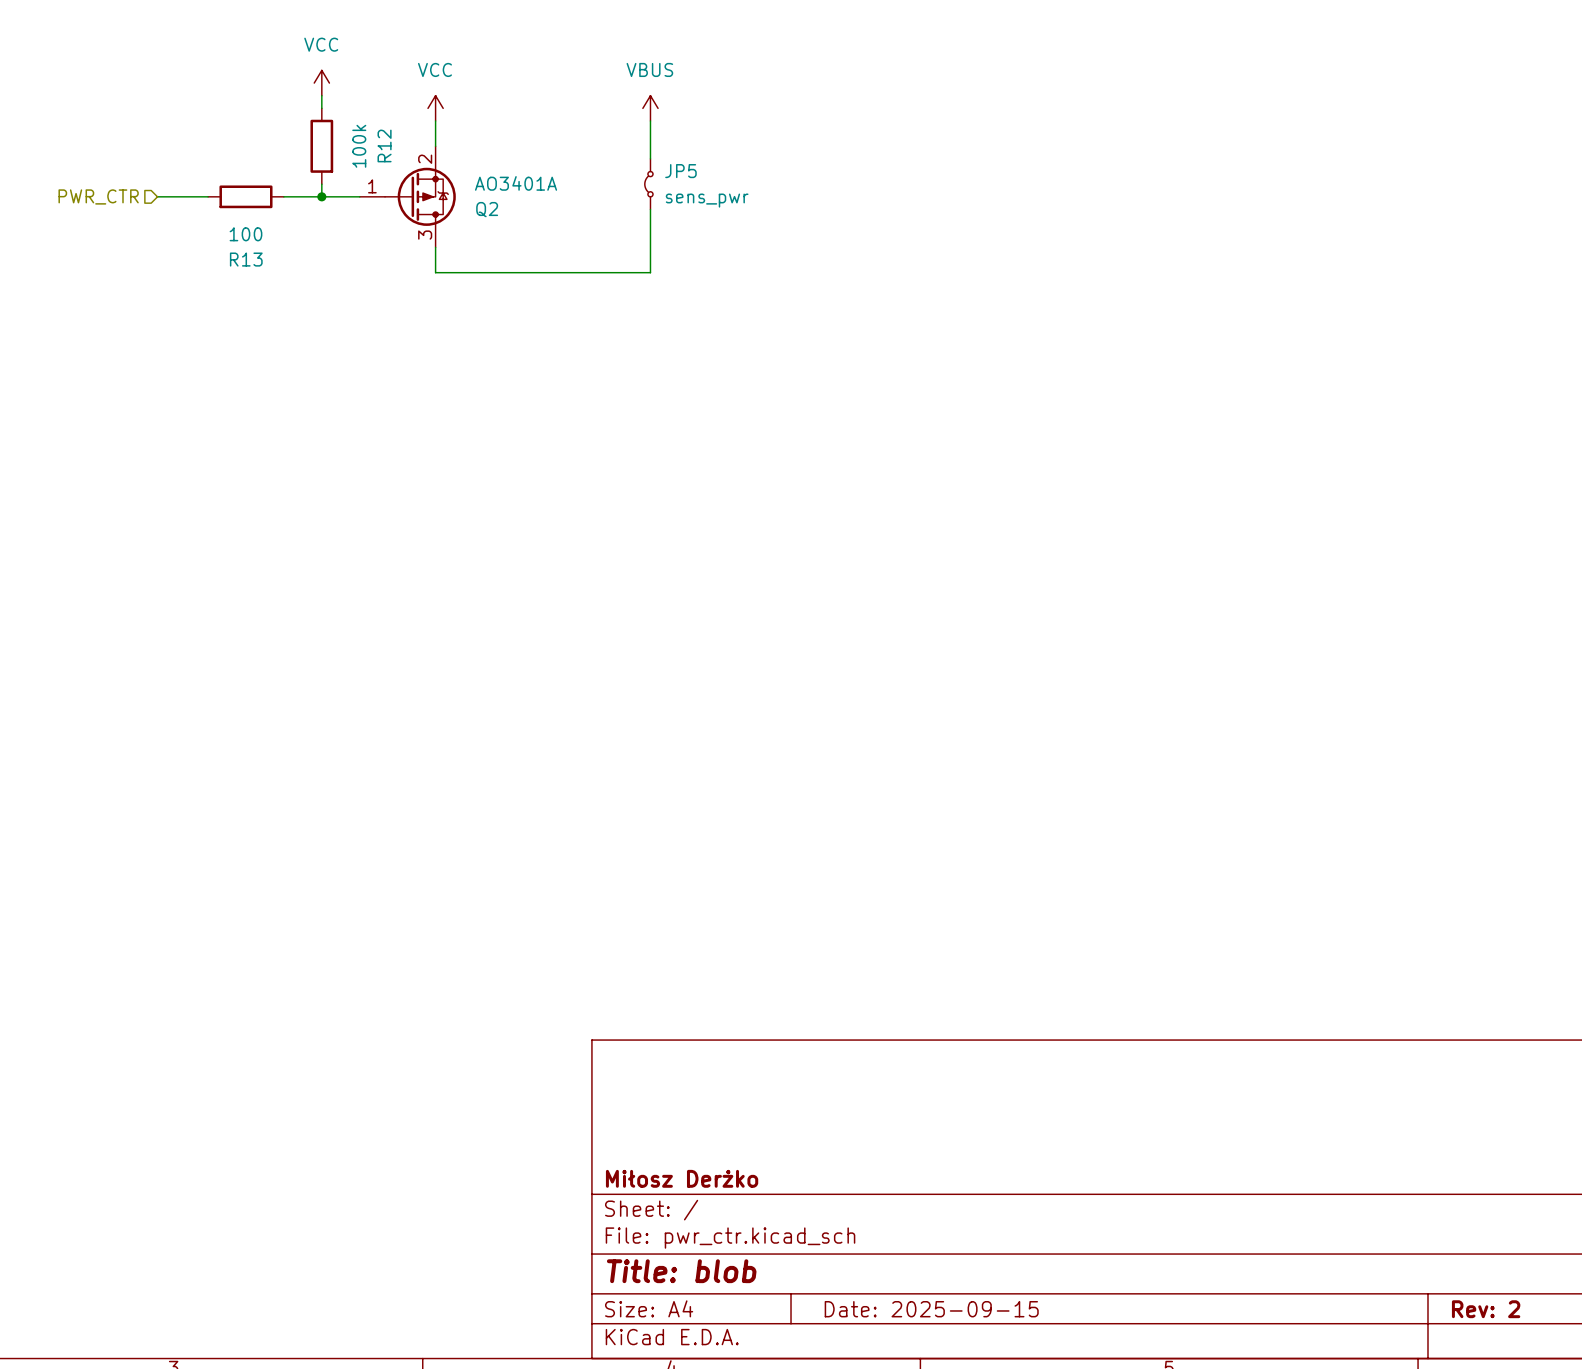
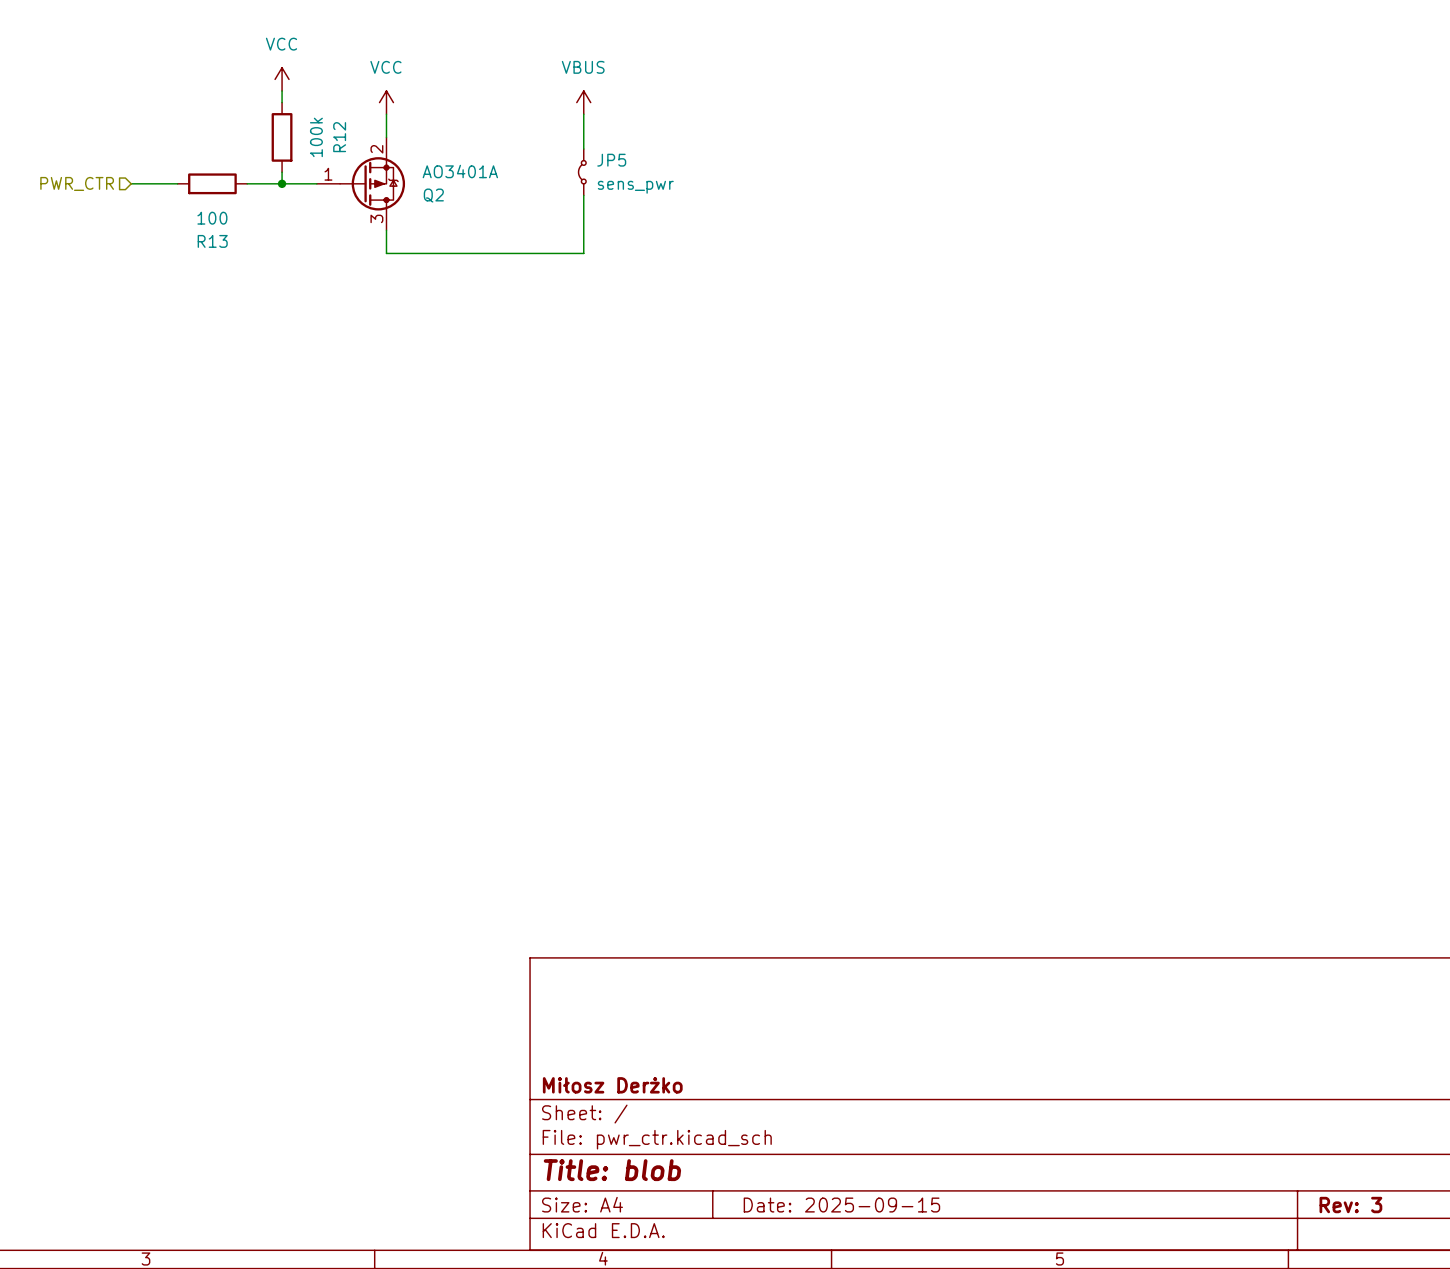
title block: Rev: 2 (1486, 1309) -> Rev: 3 (1350, 1205)

